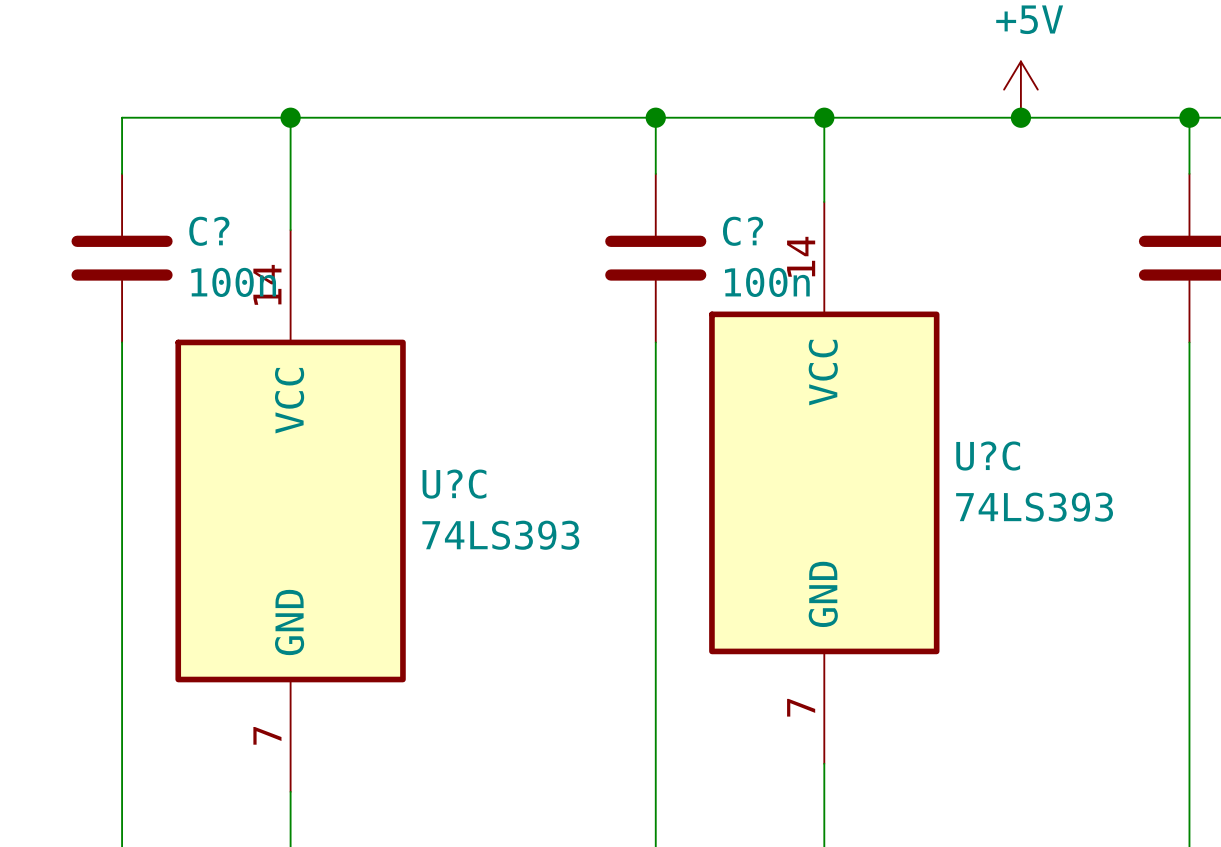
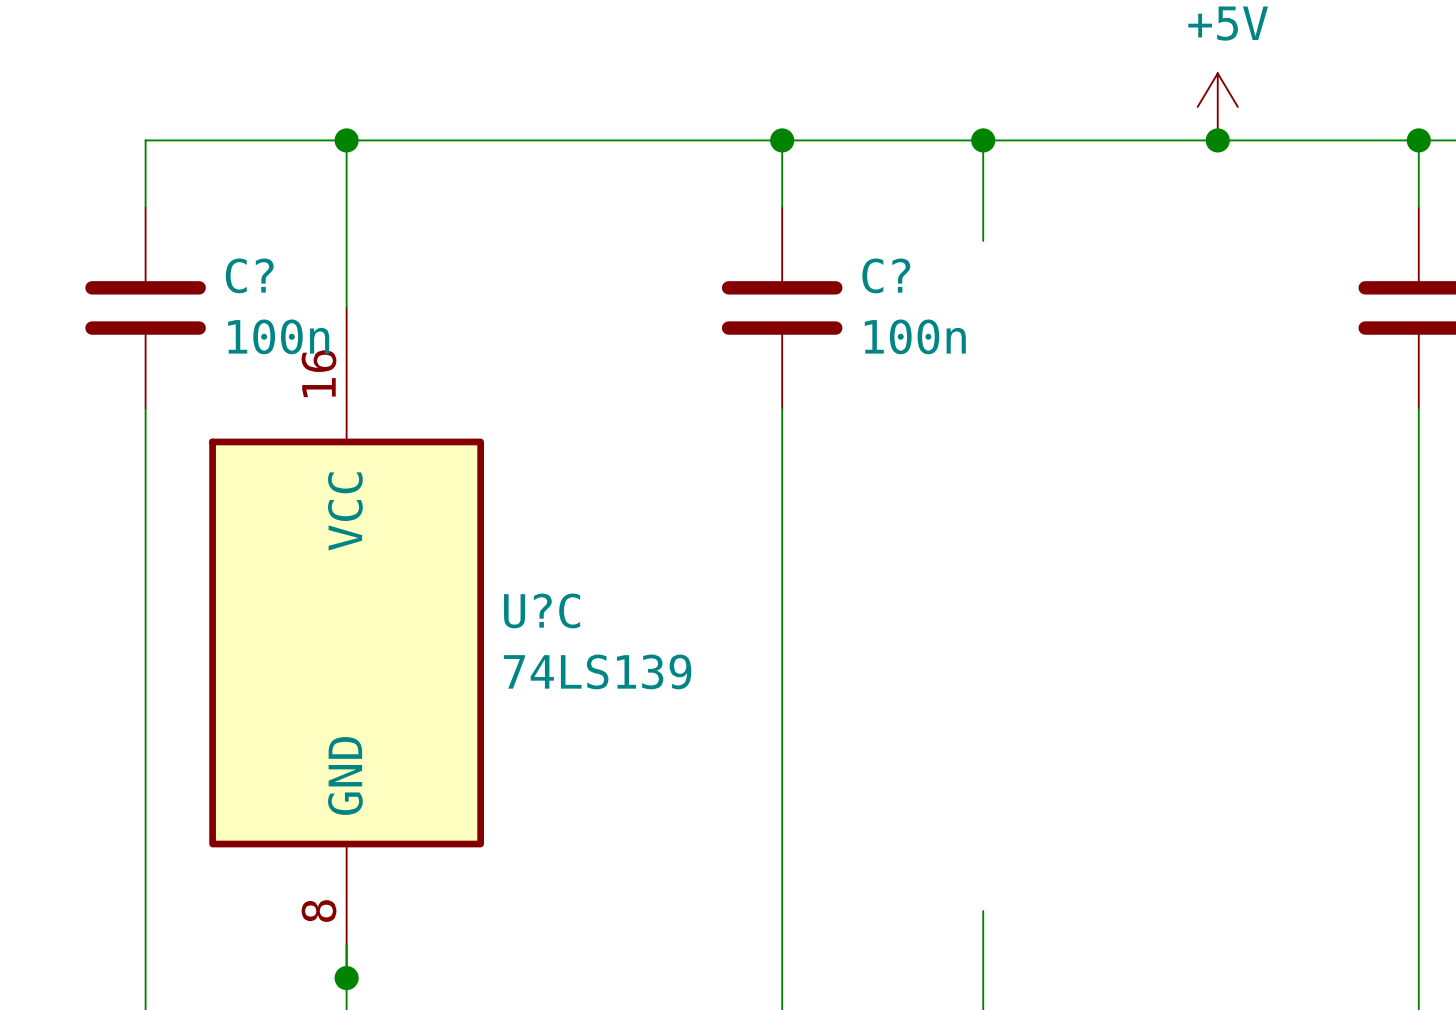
U?C: 74LS393 (824, 482) -> none
U?C: 74LS393 (290, 510) -> none
U?C: none -> 74LS139 (346, 642)
junction: none -> (346, 978)

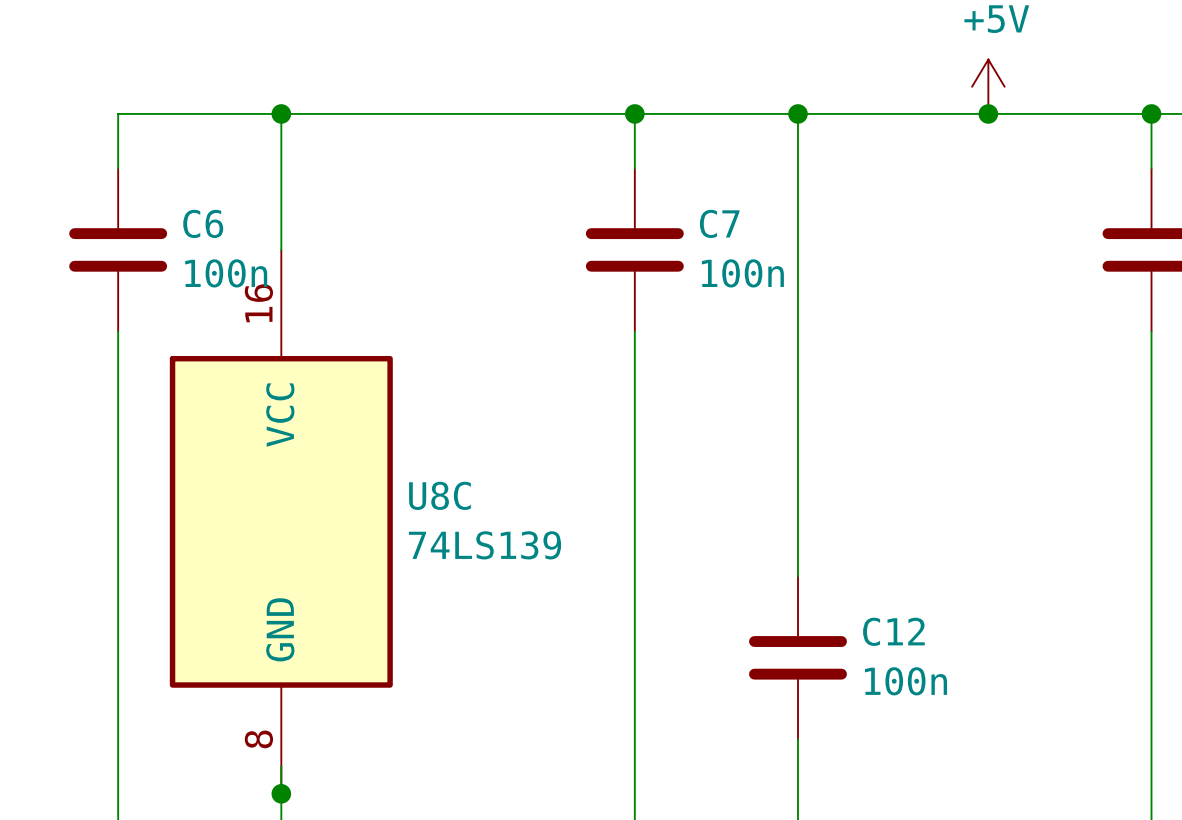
wire: none -> (798, 195) (798, 576)
C? name: C? (249, 275) -> C6 (203, 223)
C? name: C? (886, 275) -> C7 (719, 223)
U?C name: U?C (542, 610) -> U8C (439, 495)
C12: none -> 100n (798, 657)

